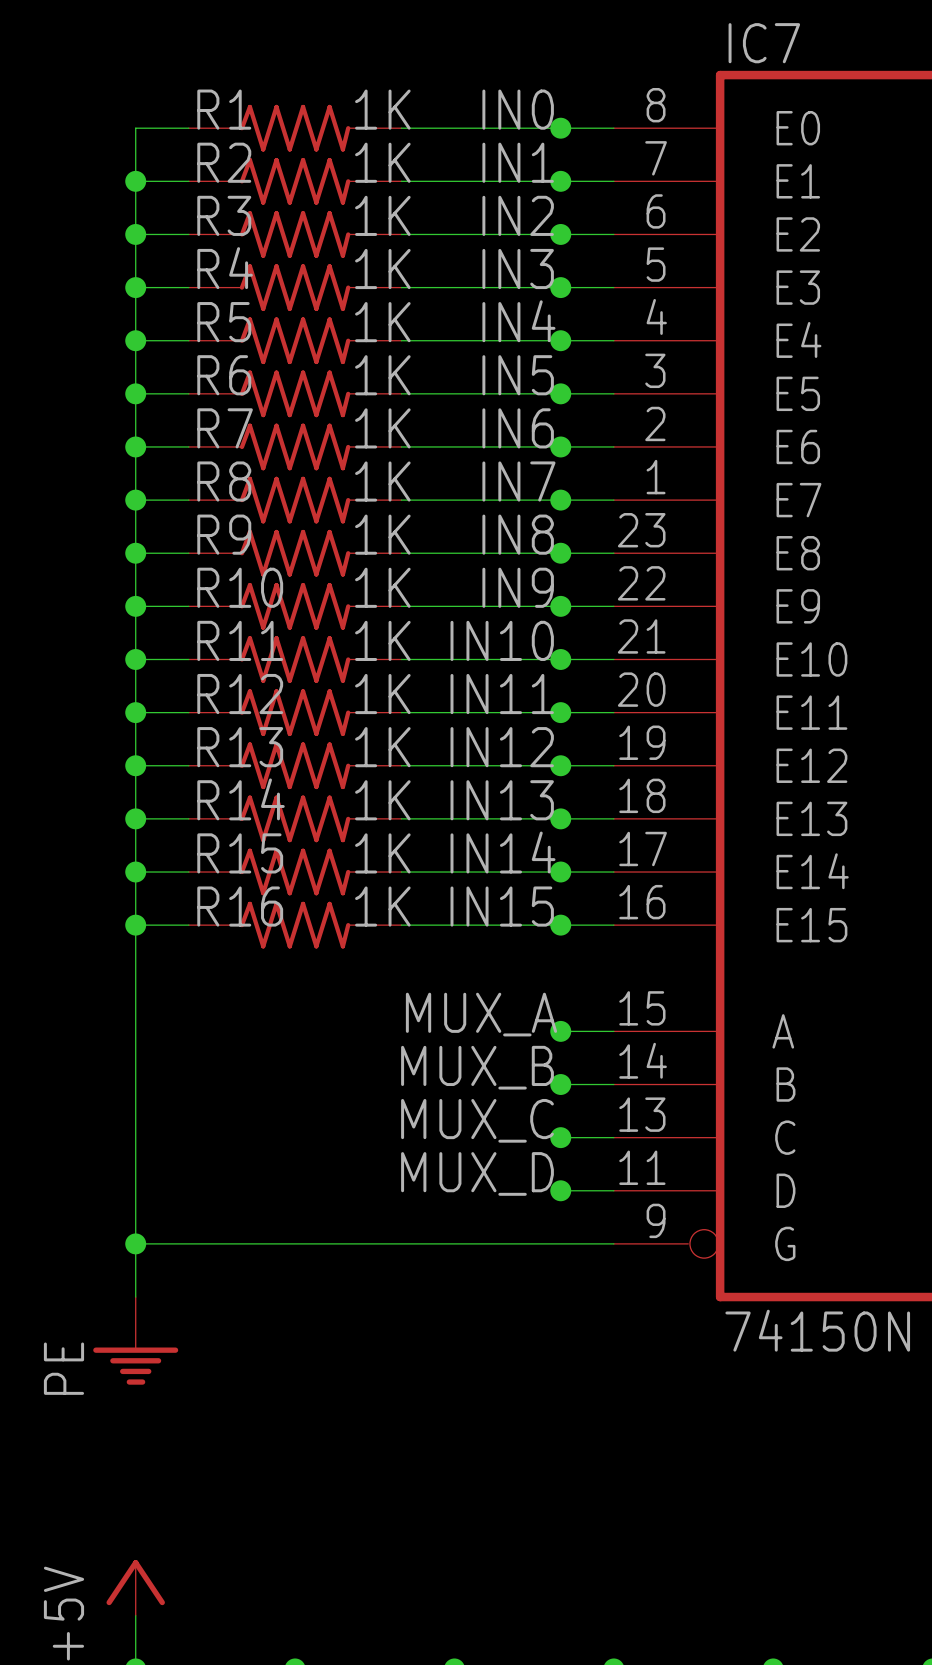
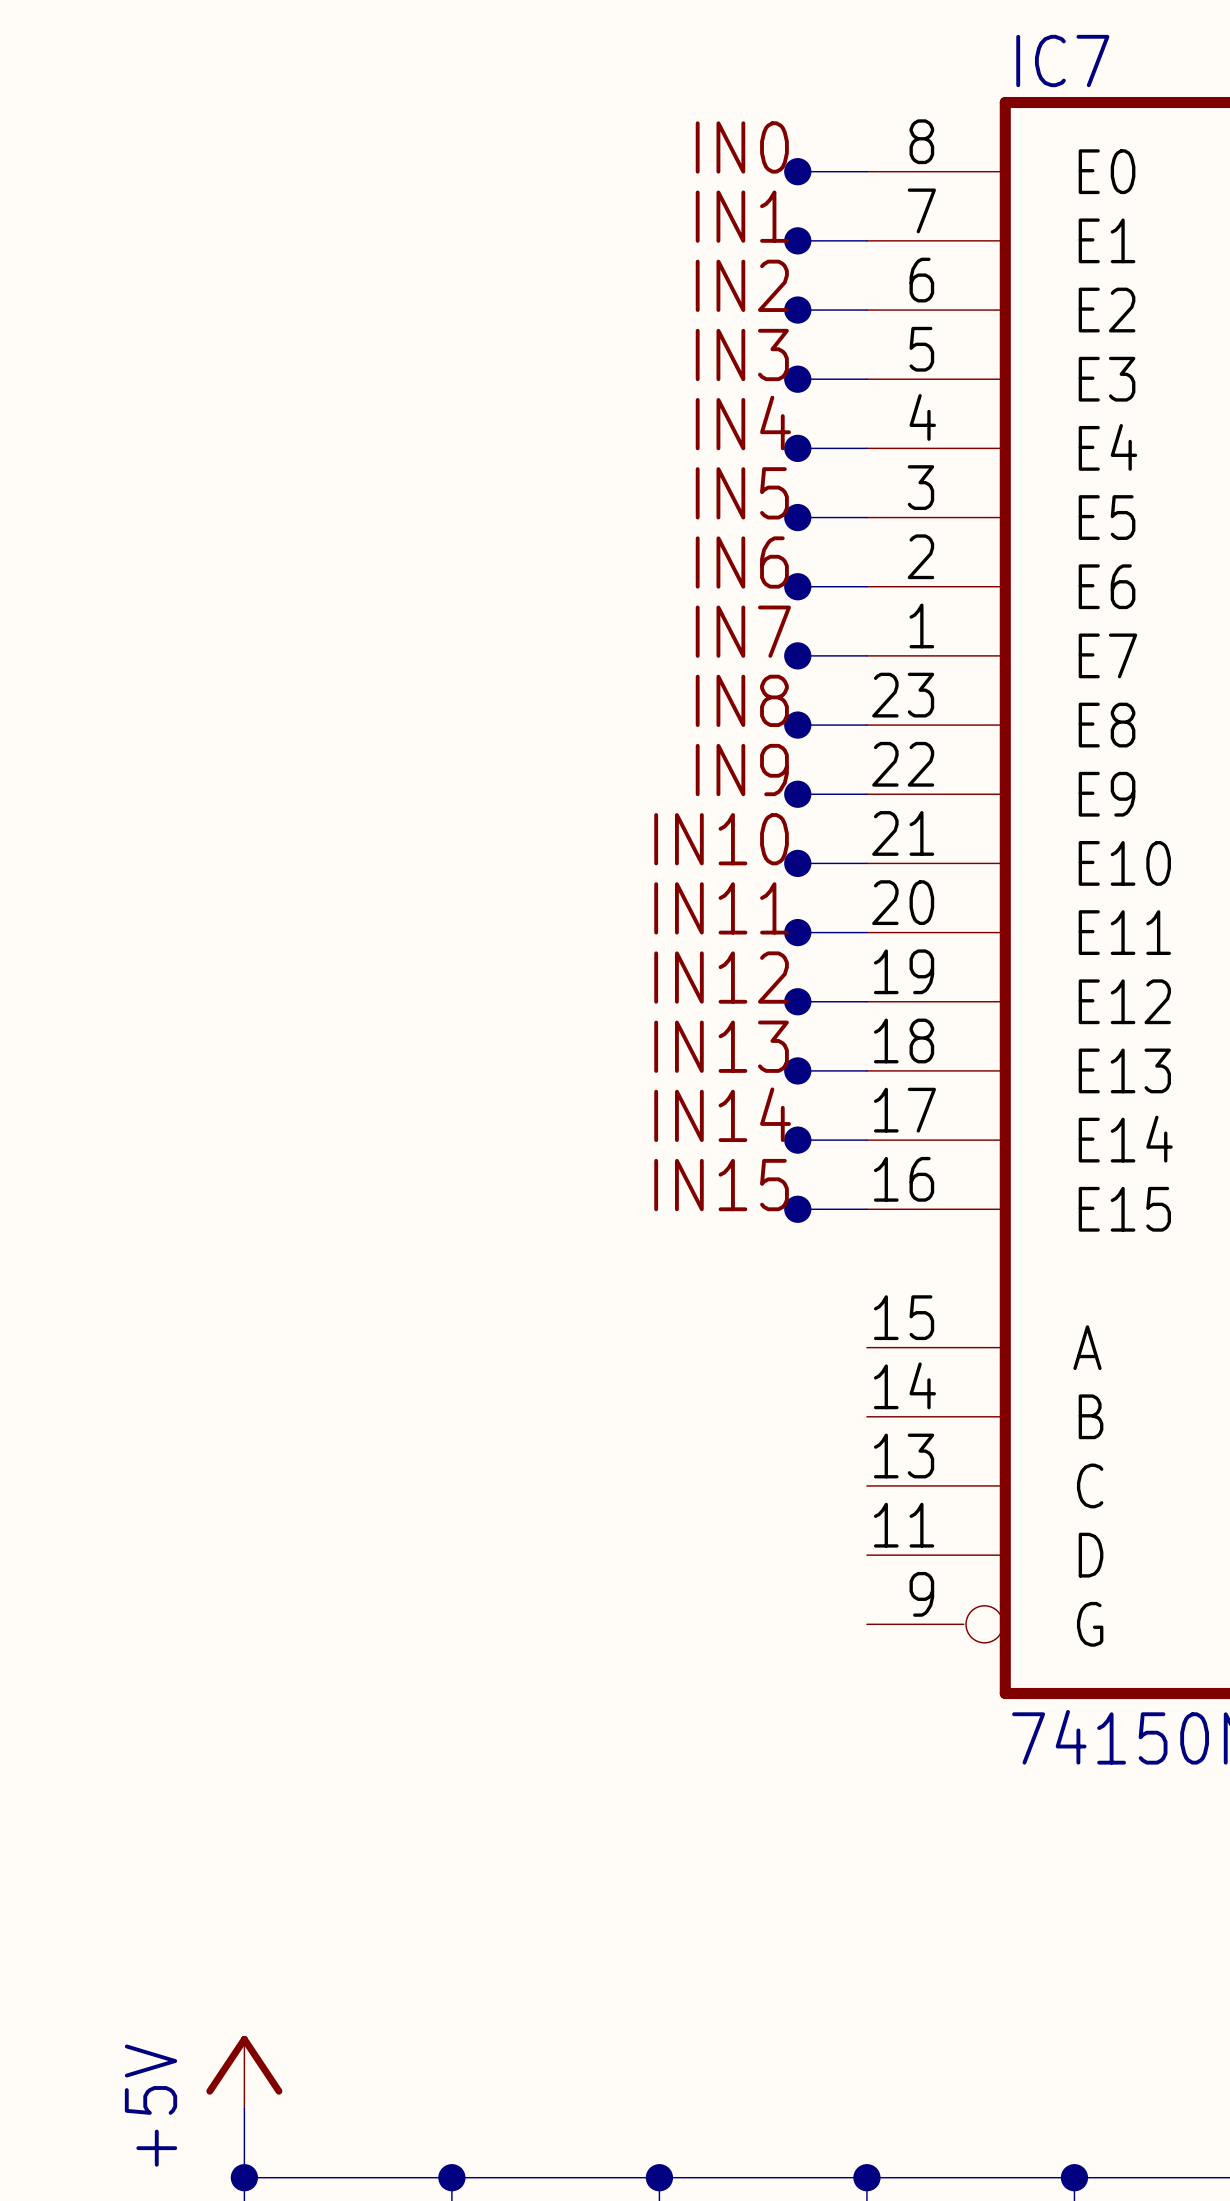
wire: (188, 128) (135, 128) (135, 1297) -> none
R1: 1K (295, 128) -> none
wire: (401, 128) (560, 128) -> none
wire: (135, 181) (188, 181) -> none
junction: (135, 181) -> none
R2: 1K (295, 181) -> none
wire: (401, 181) (560, 181) -> none
wire: (135, 234) (188, 234) -> none
junction: (135, 234) -> none
R3: 1K (295, 234) -> none
wire: (401, 234) (560, 234) -> none
wire: (135, 287) (188, 287) -> none
junction: (135, 287) -> none
R4: 1K (295, 287) -> none
wire: (401, 287) (560, 287) -> none
wire: (135, 340) (188, 340) -> none
junction: (135, 340) -> none
R5: 1K (295, 340) -> none
wire: (401, 340) (560, 340) -> none
wire: (135, 393) (188, 393) -> none
junction: (135, 393) -> none
R6: 1K (295, 393) -> none
wire: (401, 393) (560, 393) -> none
wire: (135, 446) (188, 446) -> none
junction: (135, 446) -> none
R7: 1K (295, 446) -> none
wire: (401, 446) (560, 446) -> none
wire: (135, 500) (188, 500) -> none
junction: (135, 500) -> none
R8: 1K (295, 500) -> none
wire: (401, 500) (560, 500) -> none
wire: (135, 553) (188, 553) -> none
junction: (135, 553) -> none
R9: 1K (295, 553) -> none
wire: (401, 553) (560, 553) -> none
wire: (135, 606) (188, 606) -> none
junction: (135, 606) -> none
R10: 1K (295, 606) -> none
wire: (401, 606) (560, 606) -> none
wire: (135, 659) (188, 659) -> none
junction: (135, 659) -> none
R11: 1K (295, 659) -> none
wire: (401, 659) (560, 659) -> none
wire: (135, 712) (188, 712) -> none
junction: (135, 712) -> none
R12: 1K (295, 712) -> none
wire: (401, 712) (560, 712) -> none
wire: (135, 765) (188, 765) -> none
junction: (135, 765) -> none
R13: 1K (295, 765) -> none
wire: (401, 765) (560, 765) -> none
wire: (135, 818) (188, 818) -> none
junction: (135, 818) -> none
R14: 1K (295, 818) -> none
wire: (401, 818) (560, 818) -> none
wire: (135, 872) (188, 872) -> none
junction: (135, 872) -> none
R15: 1K (295, 872) -> none
wire: (401, 872) (560, 872) -> none
wire: (135, 925) (188, 925) -> none
junction: (135, 925) -> none
R16: 1K (295, 925) -> none
wire: (401, 925) (560, 925) -> none
label: MUX_A (481, 1014) -> none
wire: (560, 1031) (613, 1031) -> none
junction: (560, 1031) -> none
label: MUX_B (477, 1067) -> none
wire: (560, 1084) (613, 1084) -> none
junction: (560, 1084) -> none
label: MUX_C (477, 1120) -> none
wire: (560, 1137) (613, 1137) -> none
junction: (560, 1137) -> none
label: MUX_D (477, 1173) -> none
wire: (560, 1190) (613, 1190) -> none
junction: (560, 1190) -> none
wire: (135, 1243) (613, 1243) -> none
junction: (135, 1243) -> none
power symbol: PE (135, 1340) -> none

